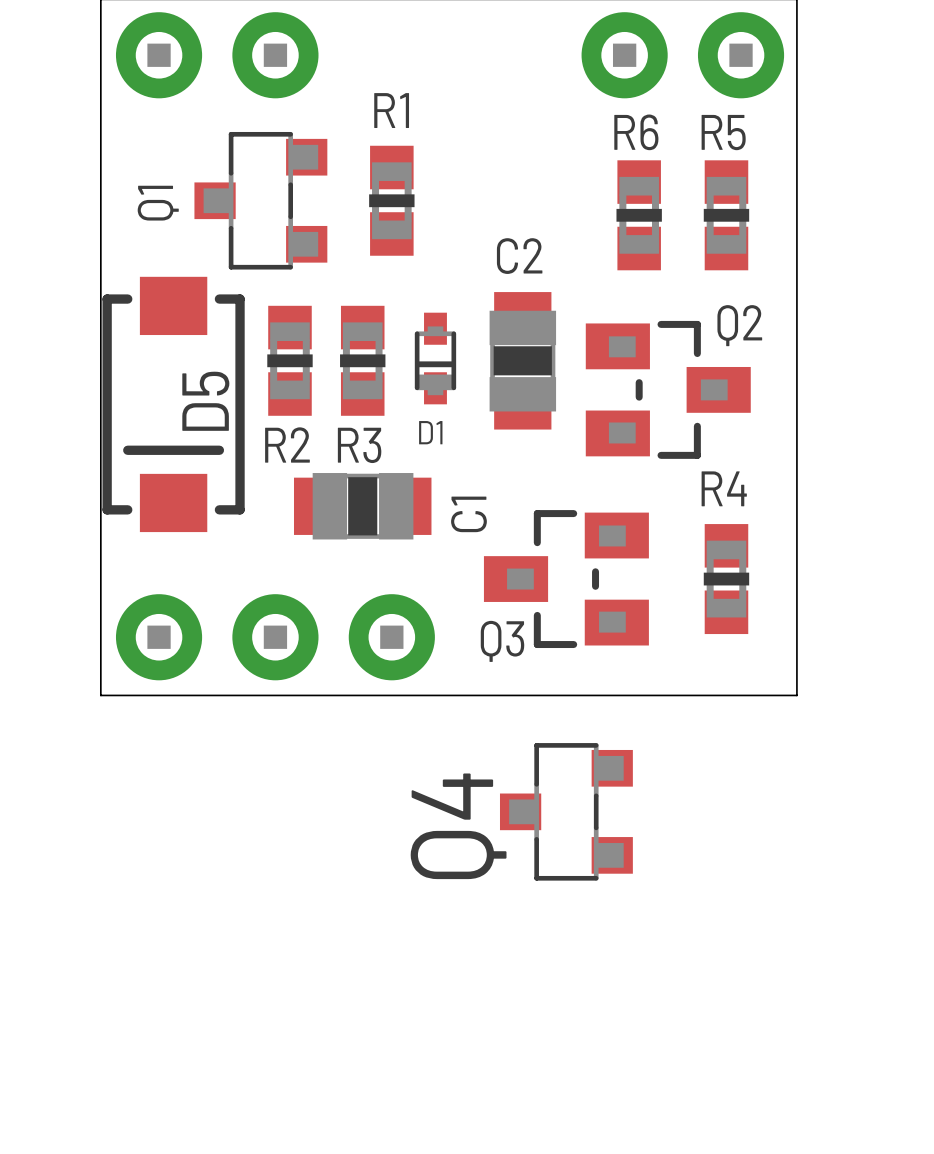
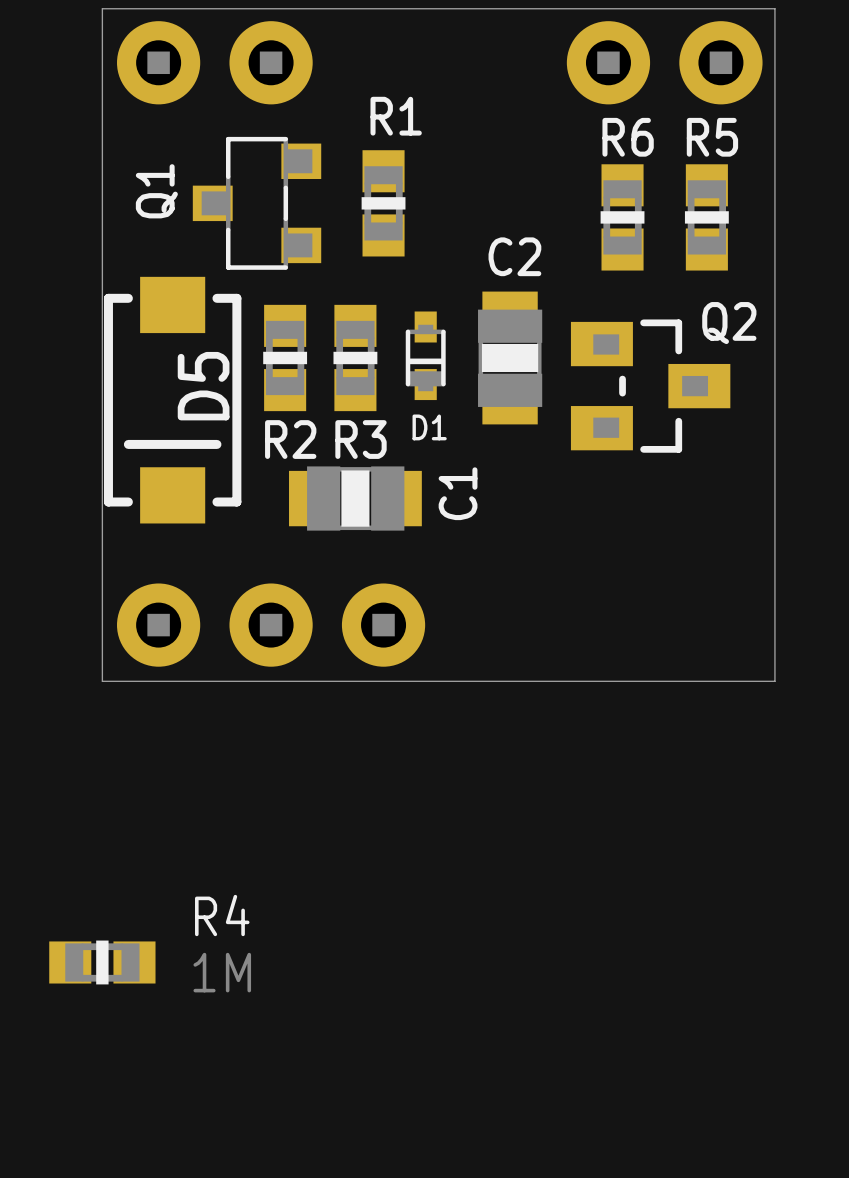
Q3: (566, 579) -> none
R4 rotation: 0° (726, 579) -> 90° clockwise (102, 962)
R4 position: (726, 579) -> (102, 962)
Q4: (566, 811) -> none
R4 value: none -> 1M (222, 972)

